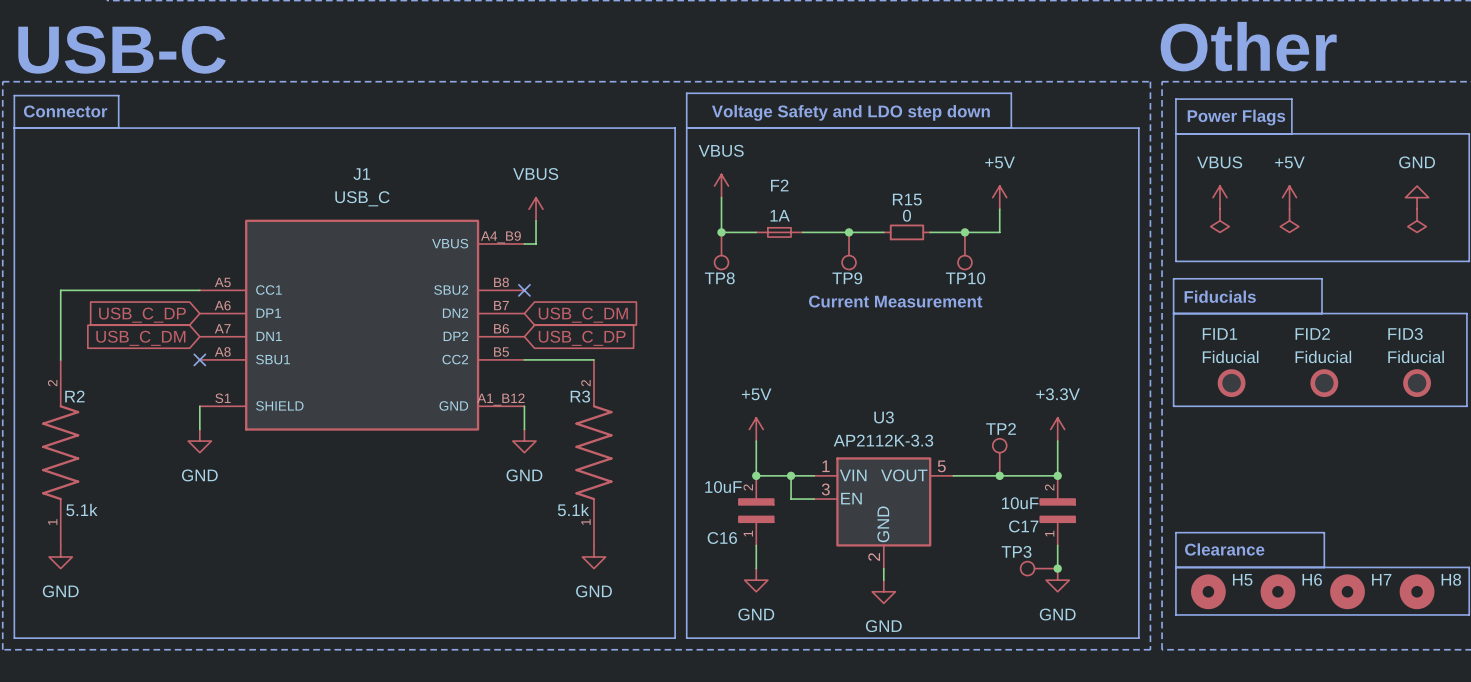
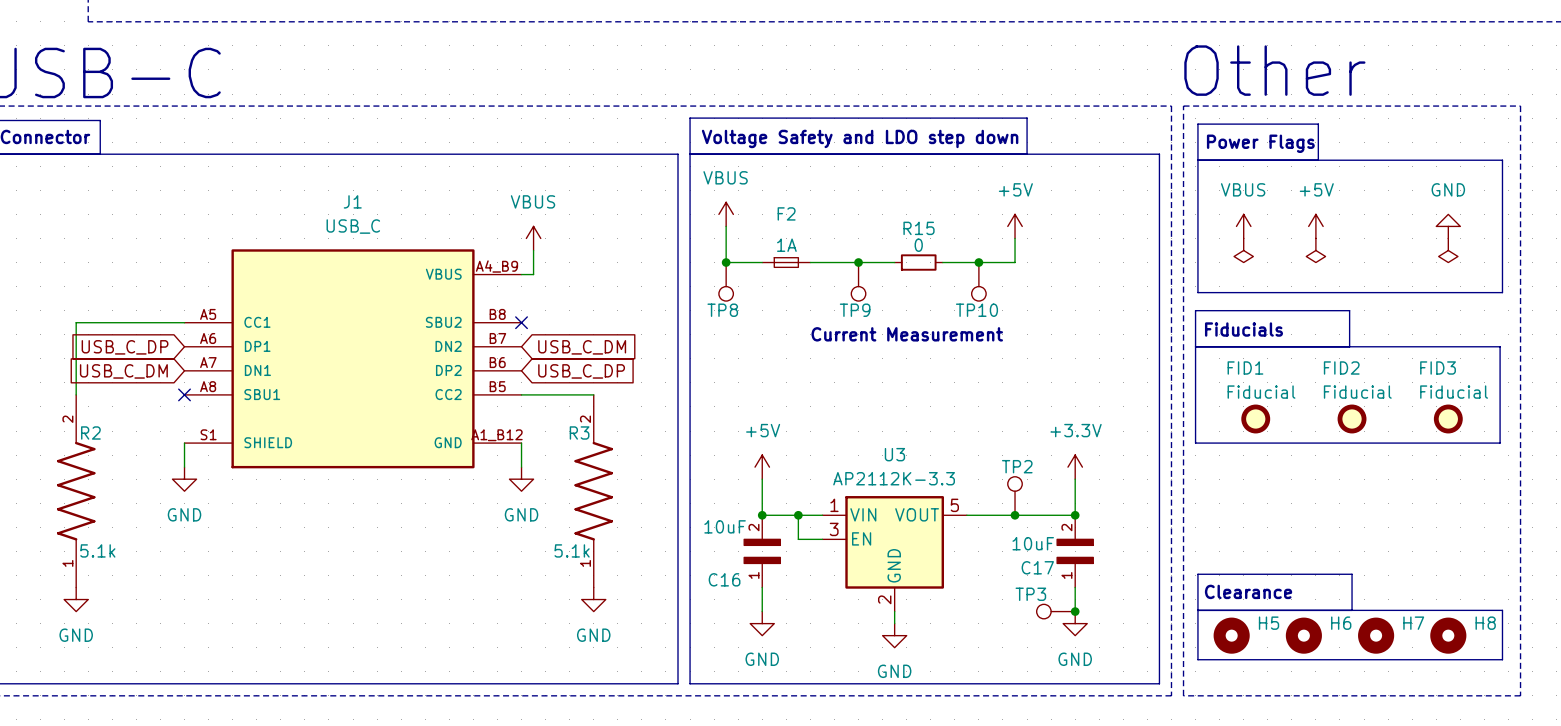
wire: (95, 290) (60, 290) (60, 359) -> (76, 322) (76, 394)
R2 position: (60, 452) -> (76, 491)
power symbol position: GND (60, 557) -> GND (76, 599)

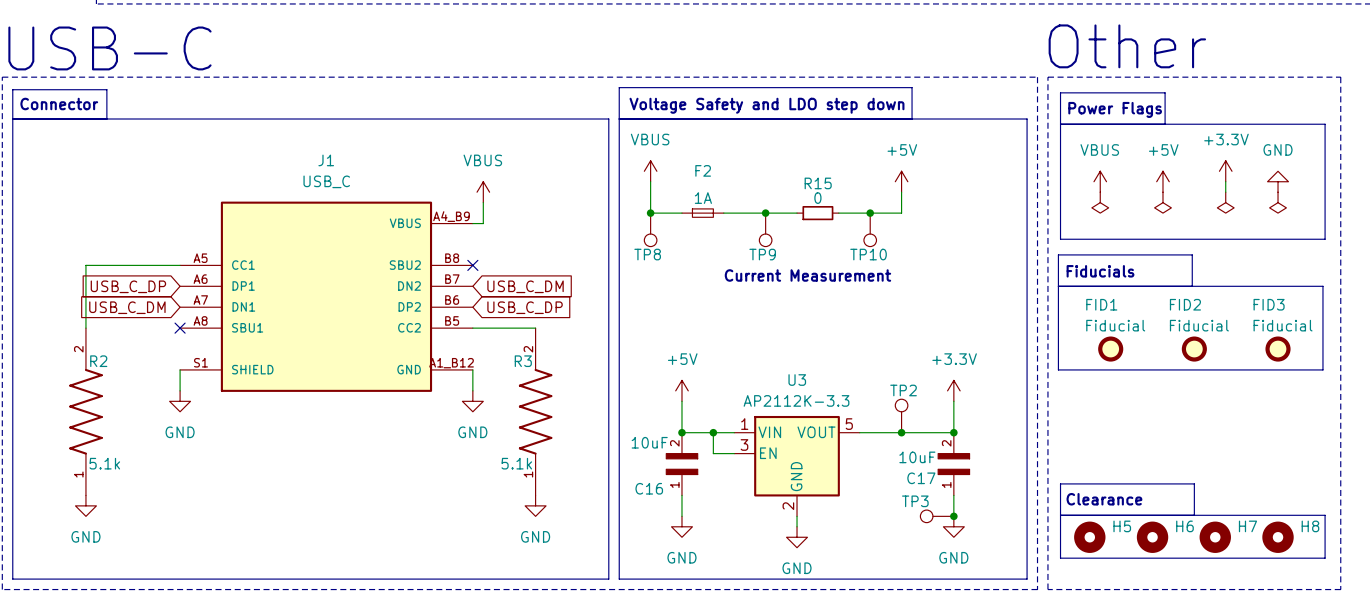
power symbol: none -> +3.3V (1225, 171)
wire: none -> (1225, 181) (1225, 192)
power symbol: none -> (1225, 202)

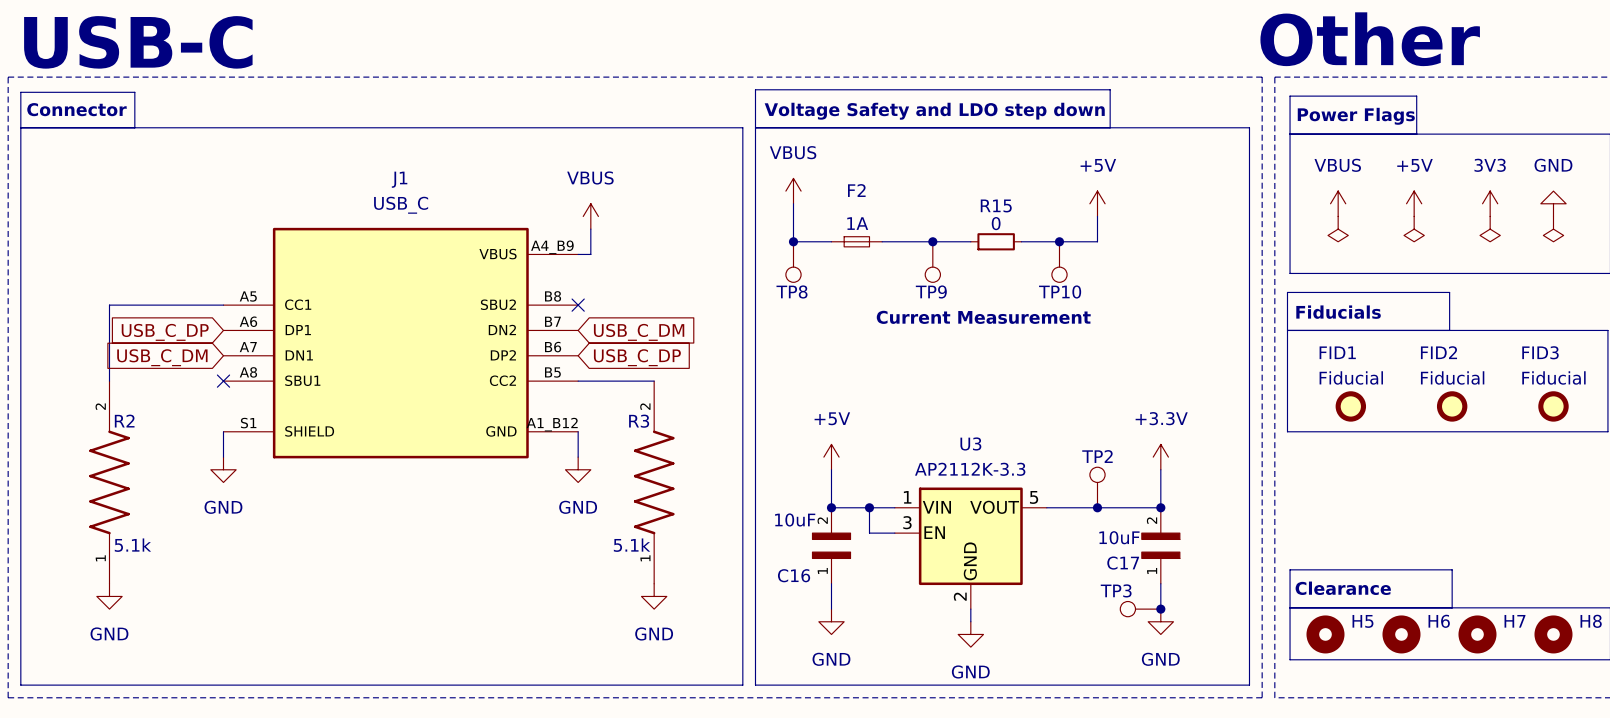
power symbol: +3.3V (1225, 171) -> none
power symbol: none -> 3V3 (1490, 203)

